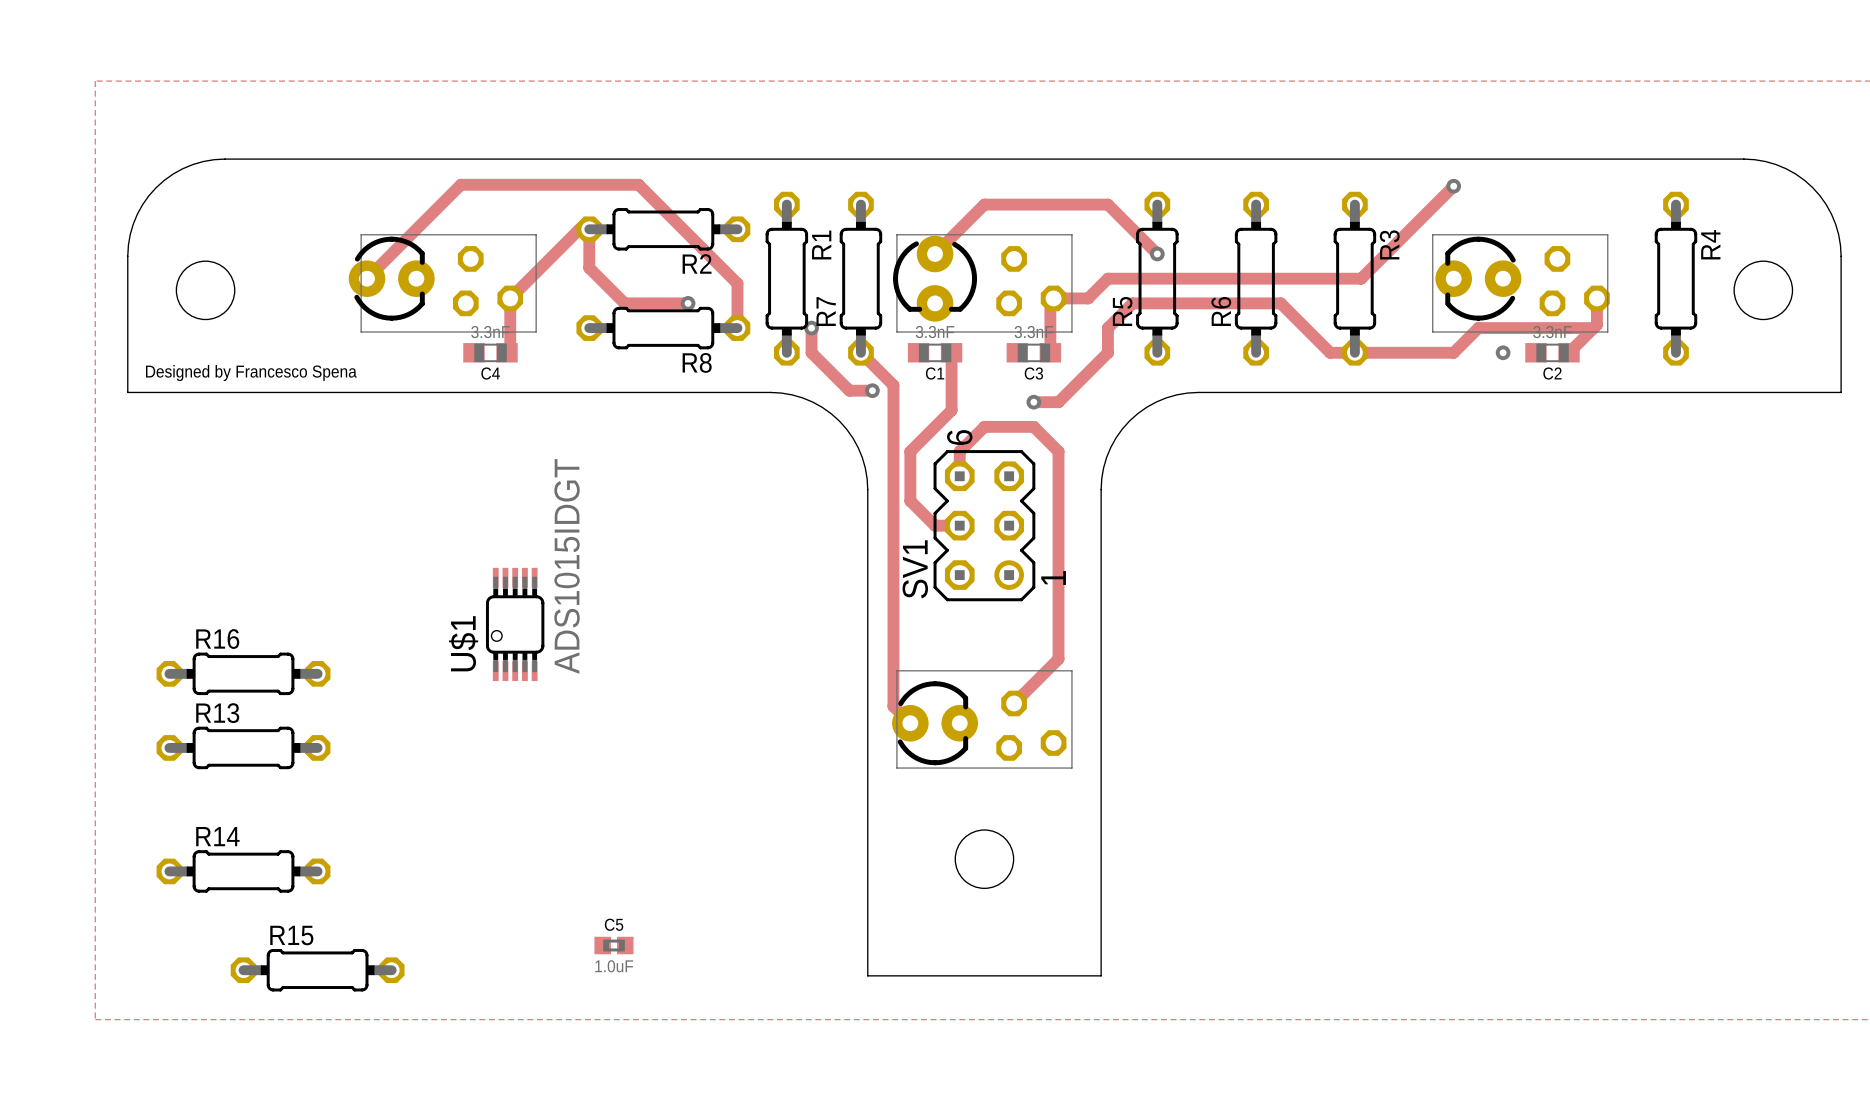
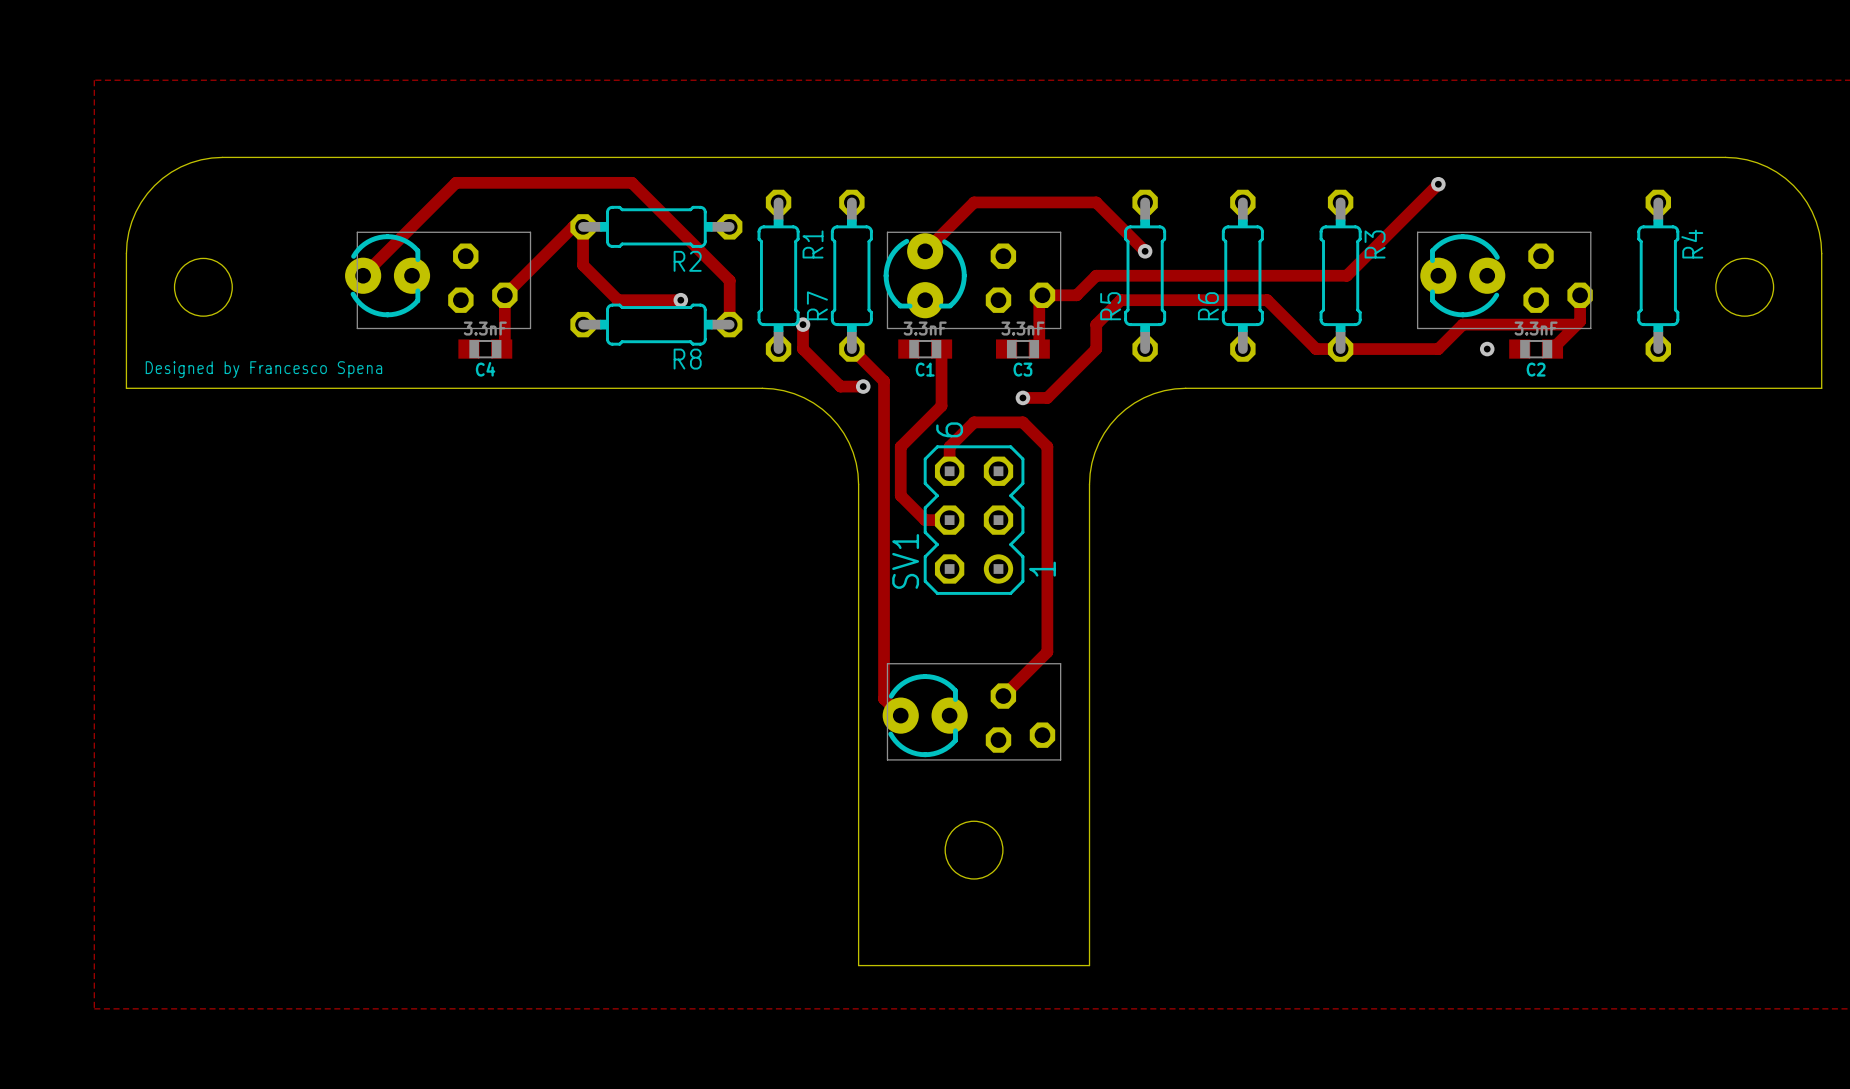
U$1: ADS1015IDGT (515, 624) -> none
R16: (243, 673) -> none
R13: (243, 747) -> none
R14: (243, 871) -> none
C5: 1.0uF (613, 945) -> none
R15: (317, 970) -> none

